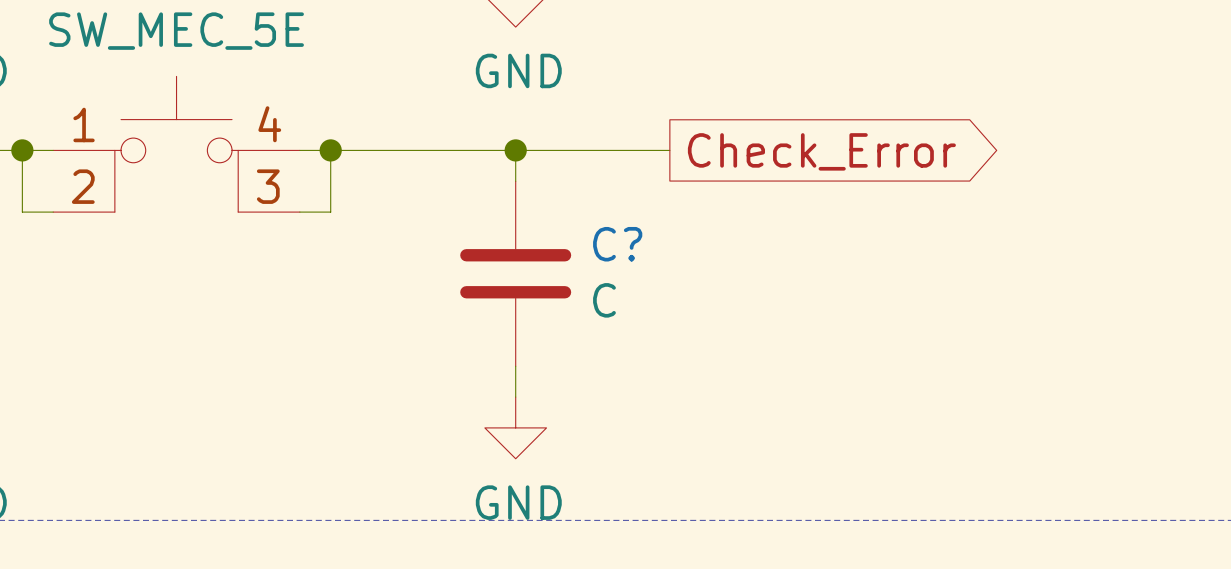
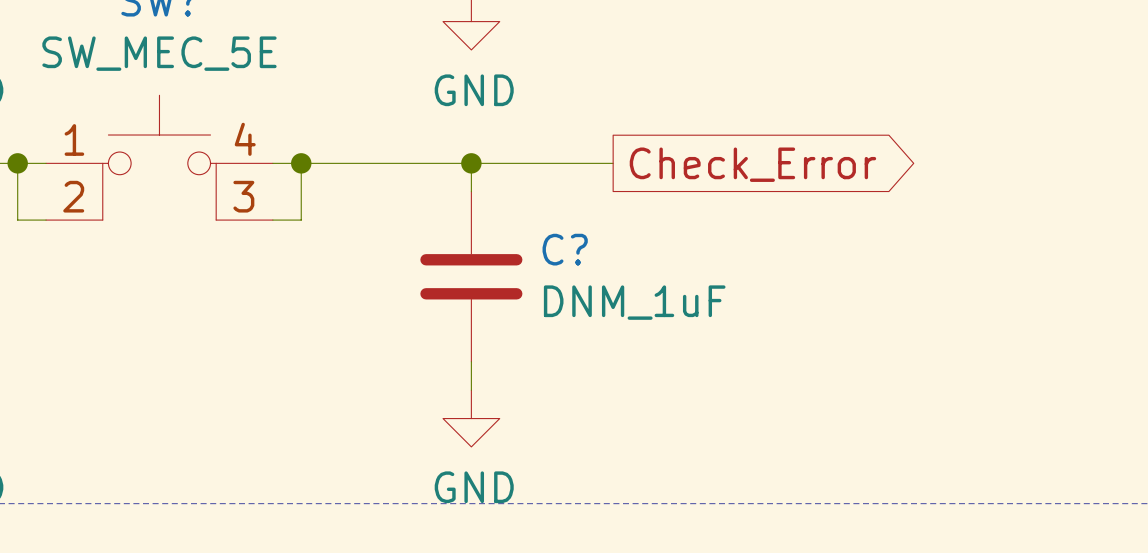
C? value: C (604, 300) -> DNM_1uF (634, 302)

